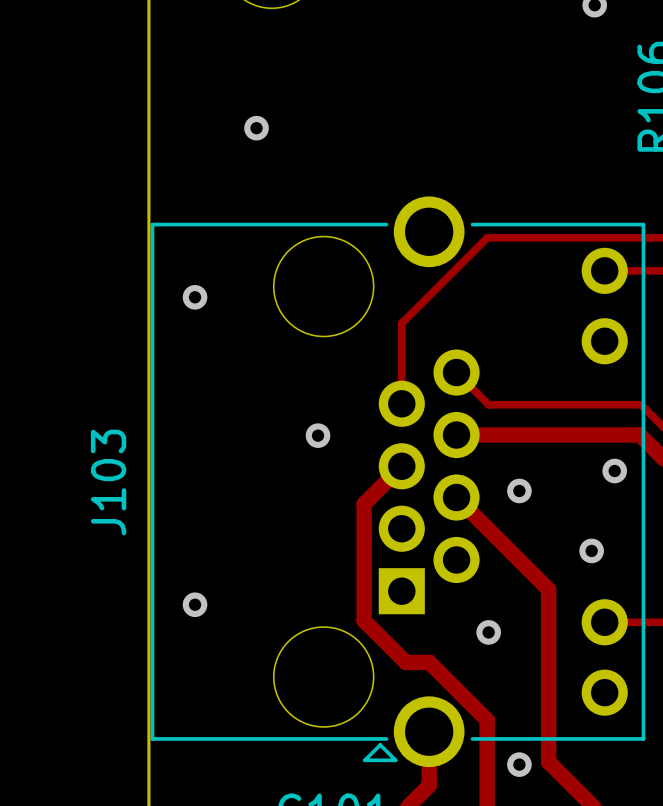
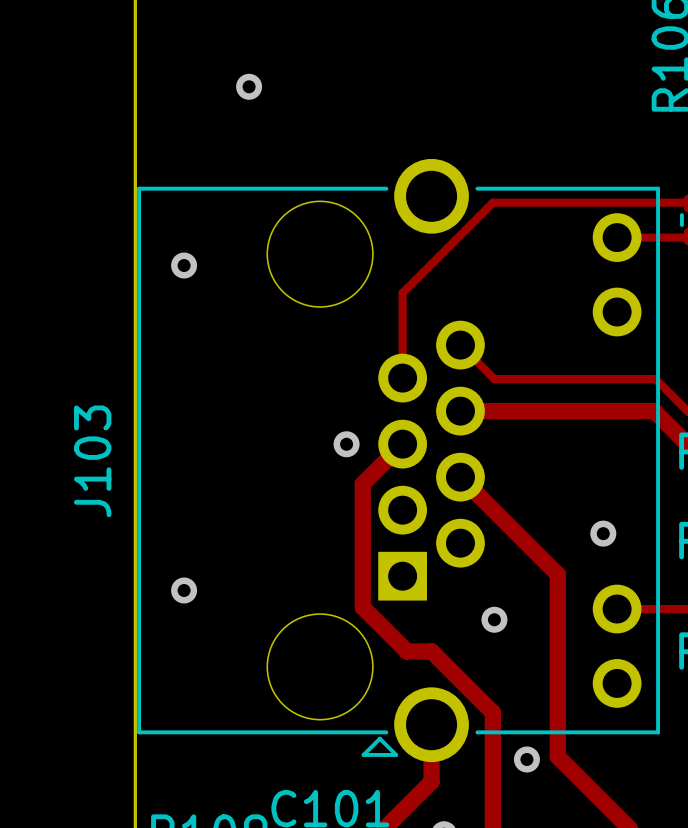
via position: (318, 435) -> (346, 444)
via: (614, 471) -> none
via: (519, 490) -> none

